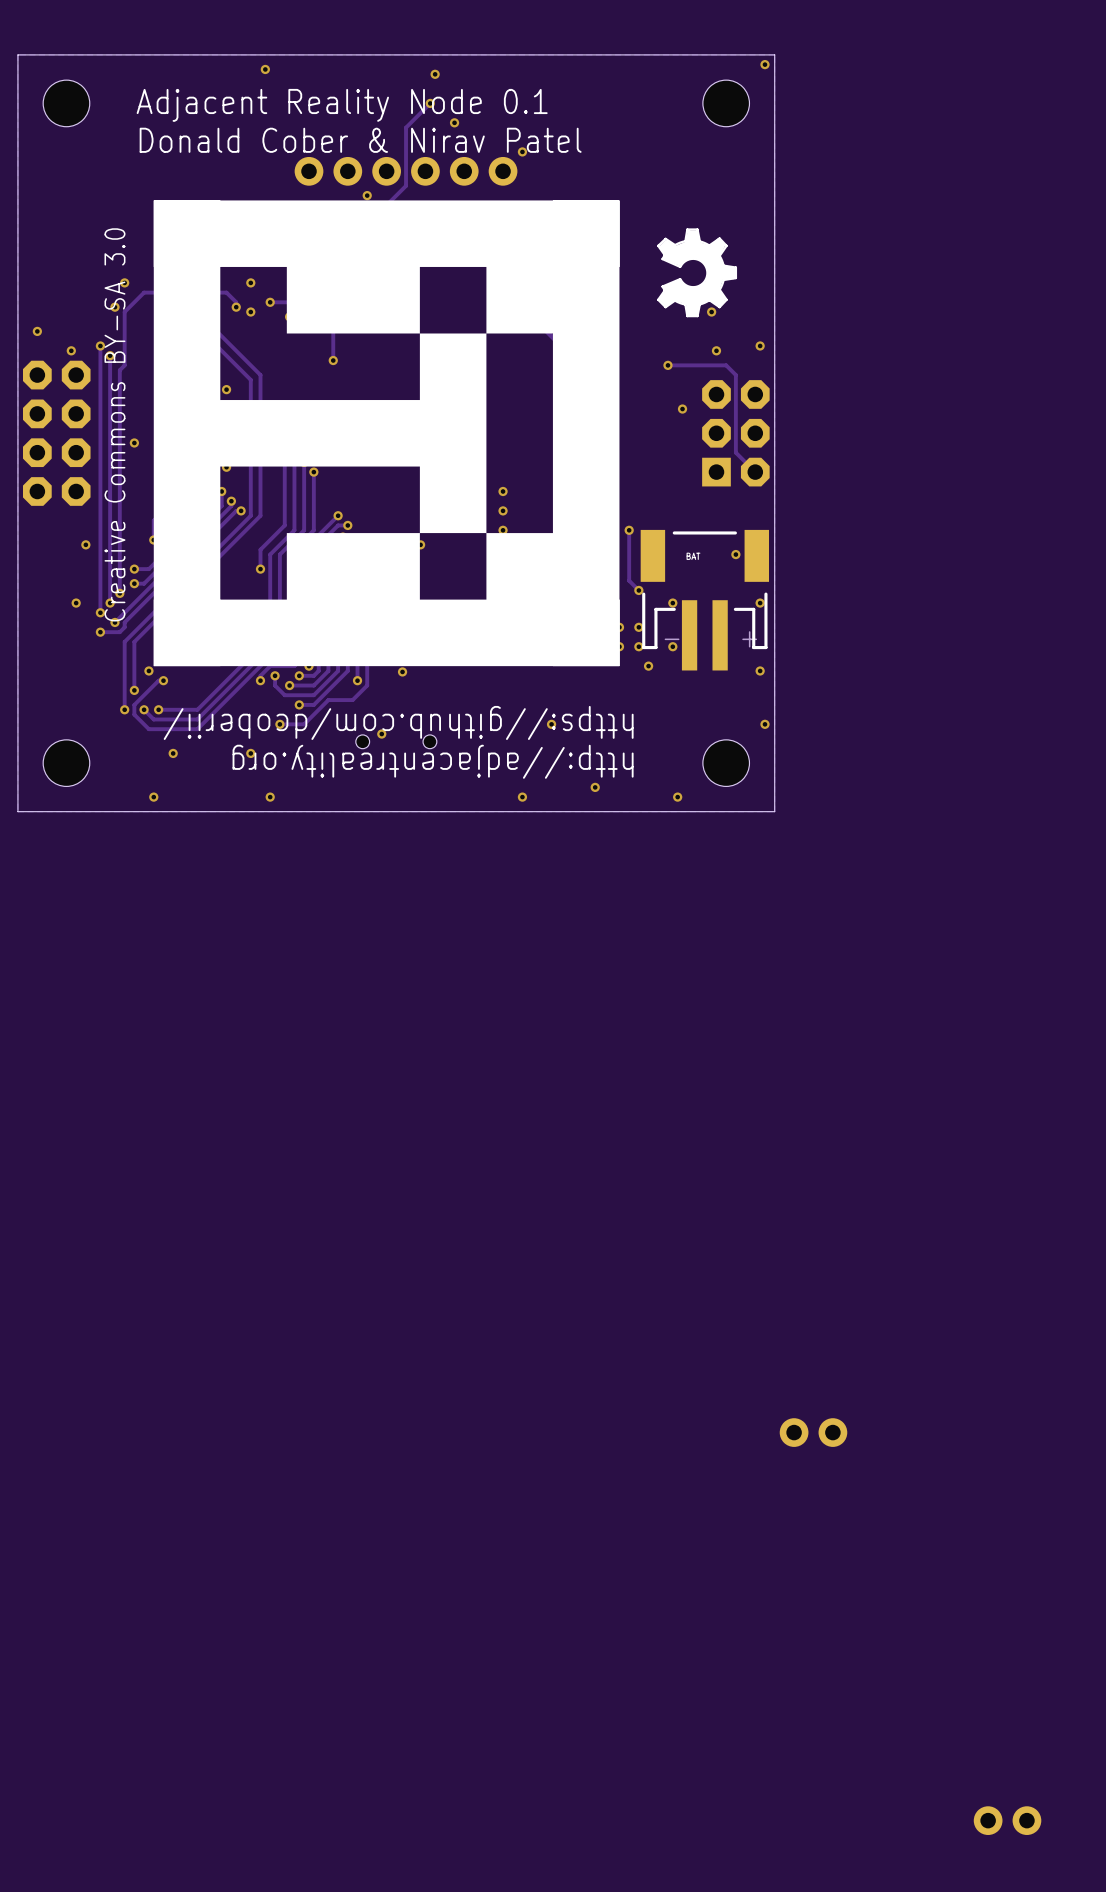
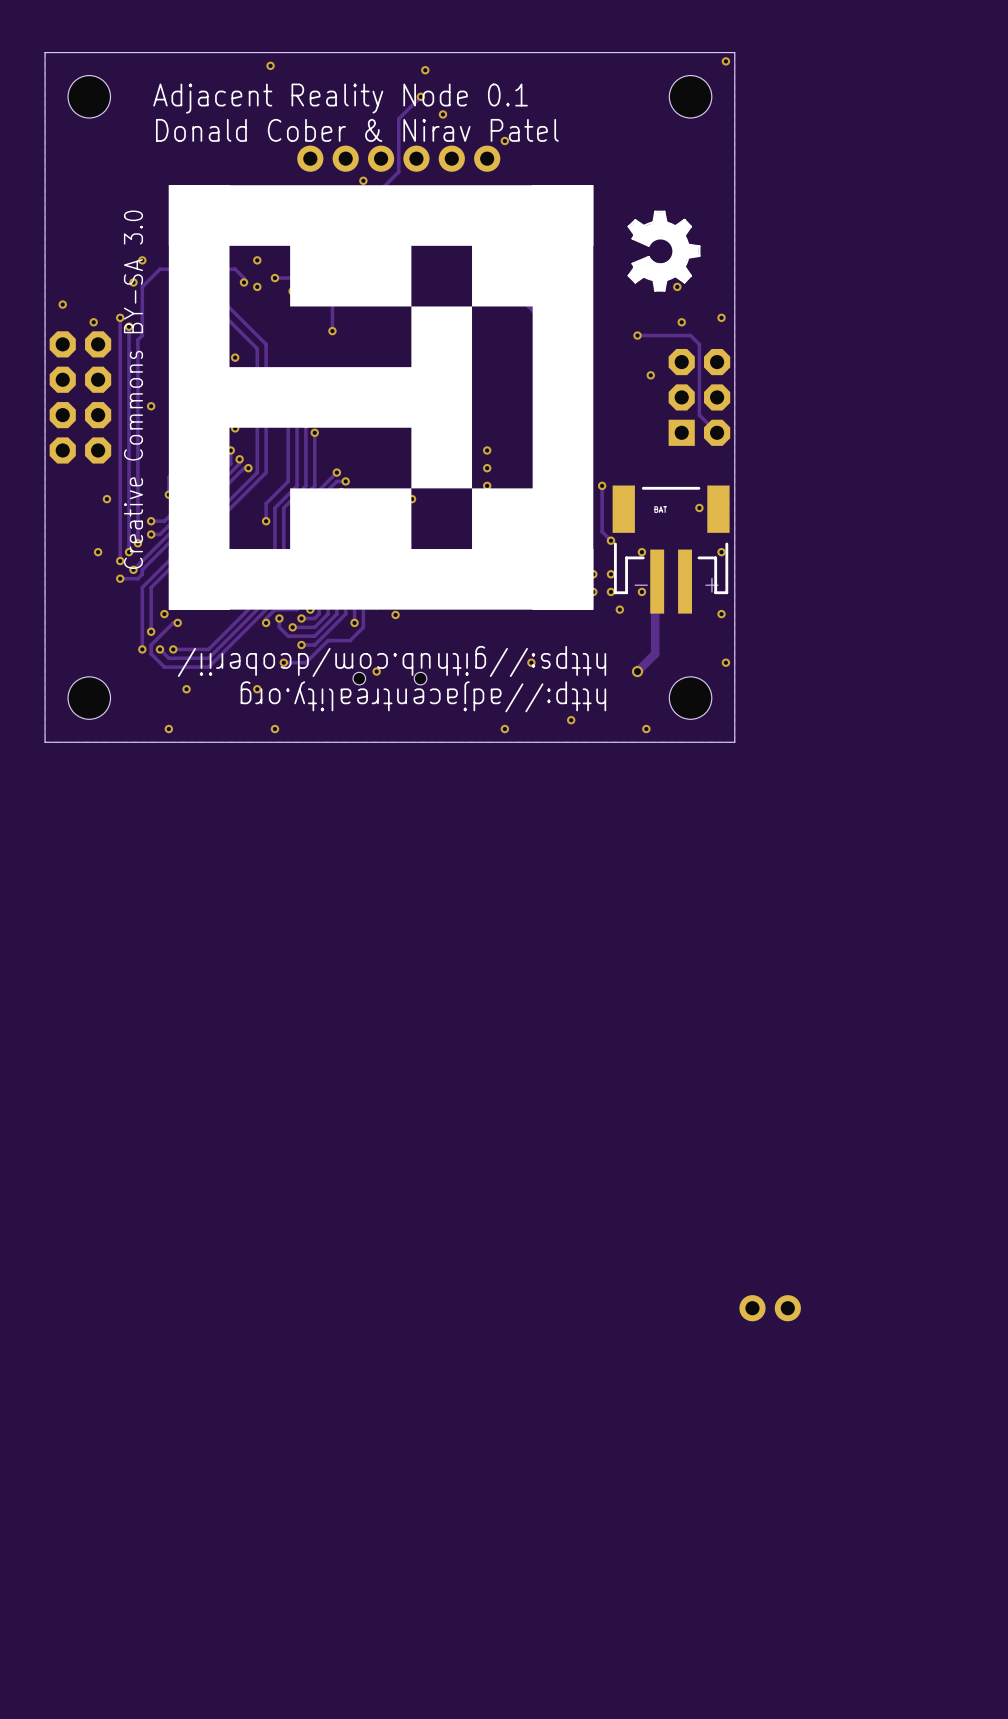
track: none -> (657, 581) (655, 583) (655, 653) (637, 671)
via: none -> (637, 671)
part: (1007, 1820) -> none

